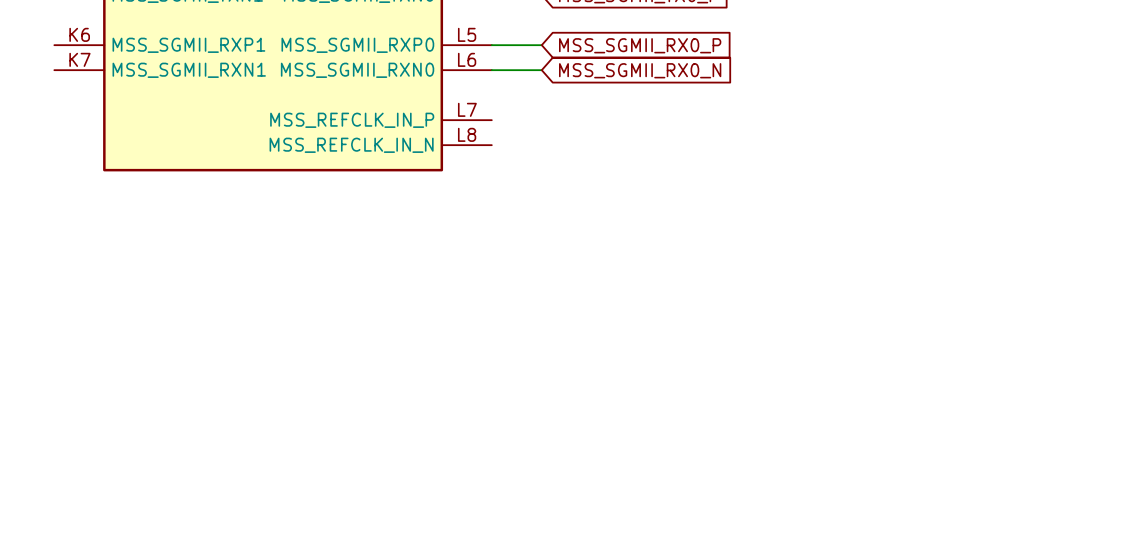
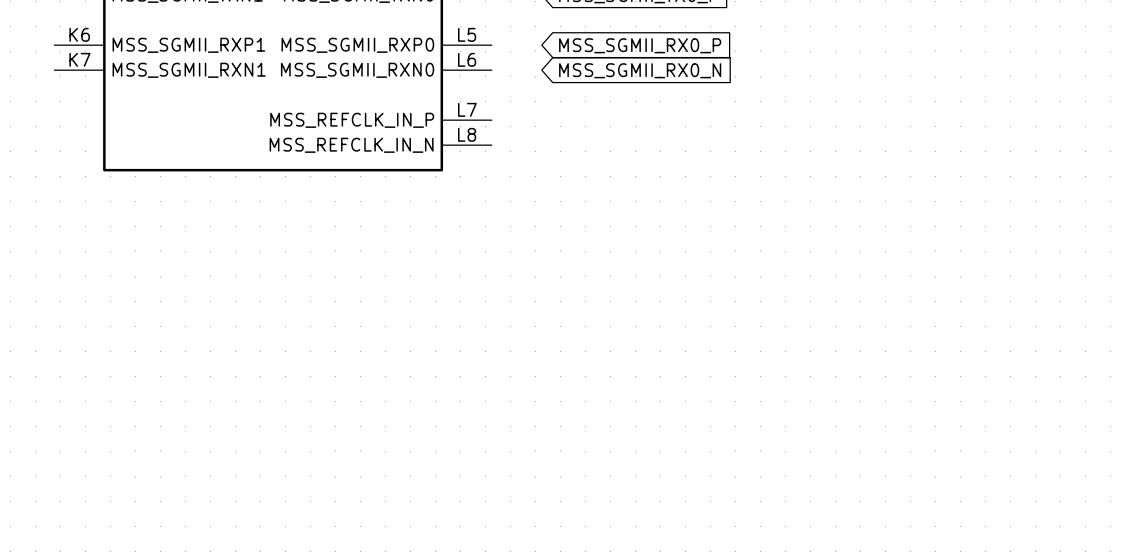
wire: (491, 45) (541, 45) -> none
wire: (491, 70) (541, 70) -> none

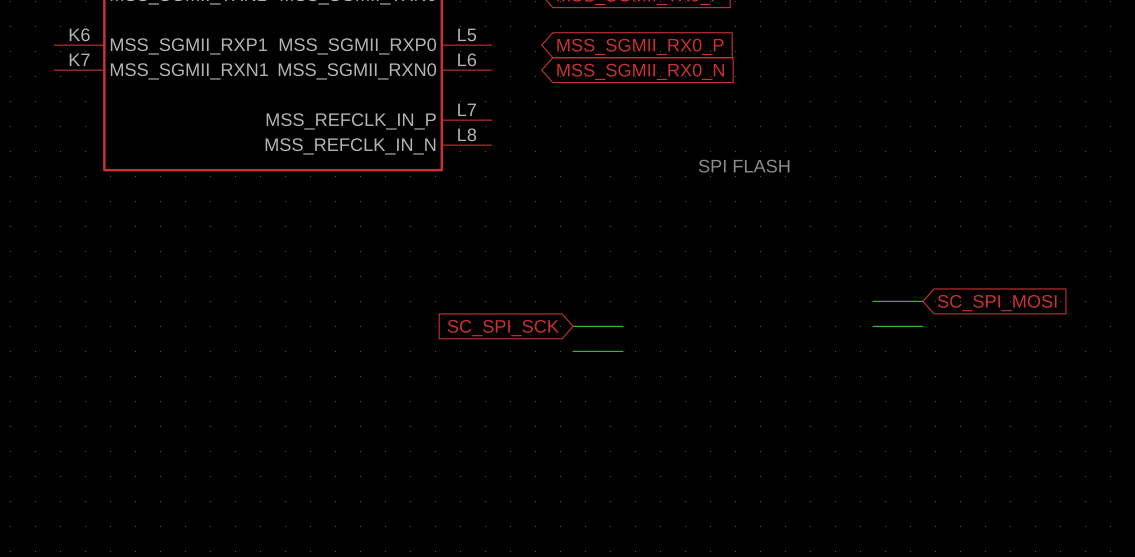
text: none -> SPI FLASH (744, 166)
wire: none -> (872, 301) (922, 301)
global label: none -> SC_SPI_MOSI (997, 303)
global label: none -> SC_SPI_SCK (503, 328)
wire: none -> (573, 326) (623, 326)
wire: none -> (872, 326) (922, 326)
wire: none -> (573, 351) (623, 351)

